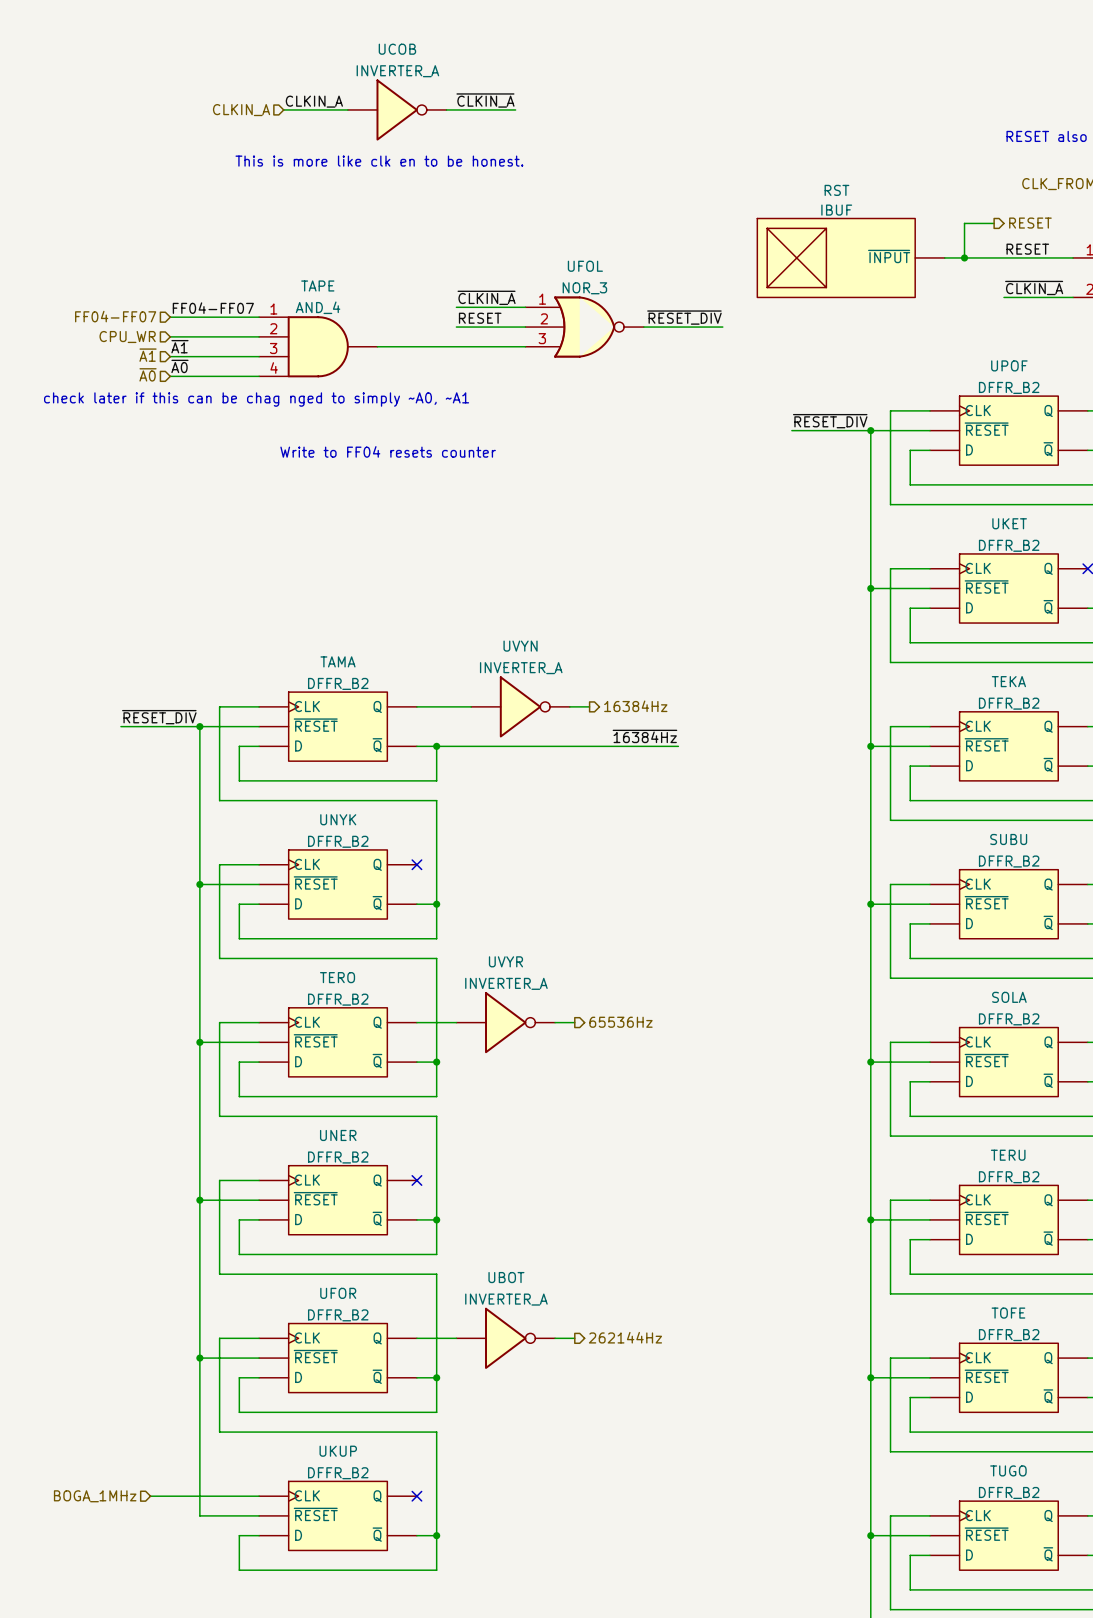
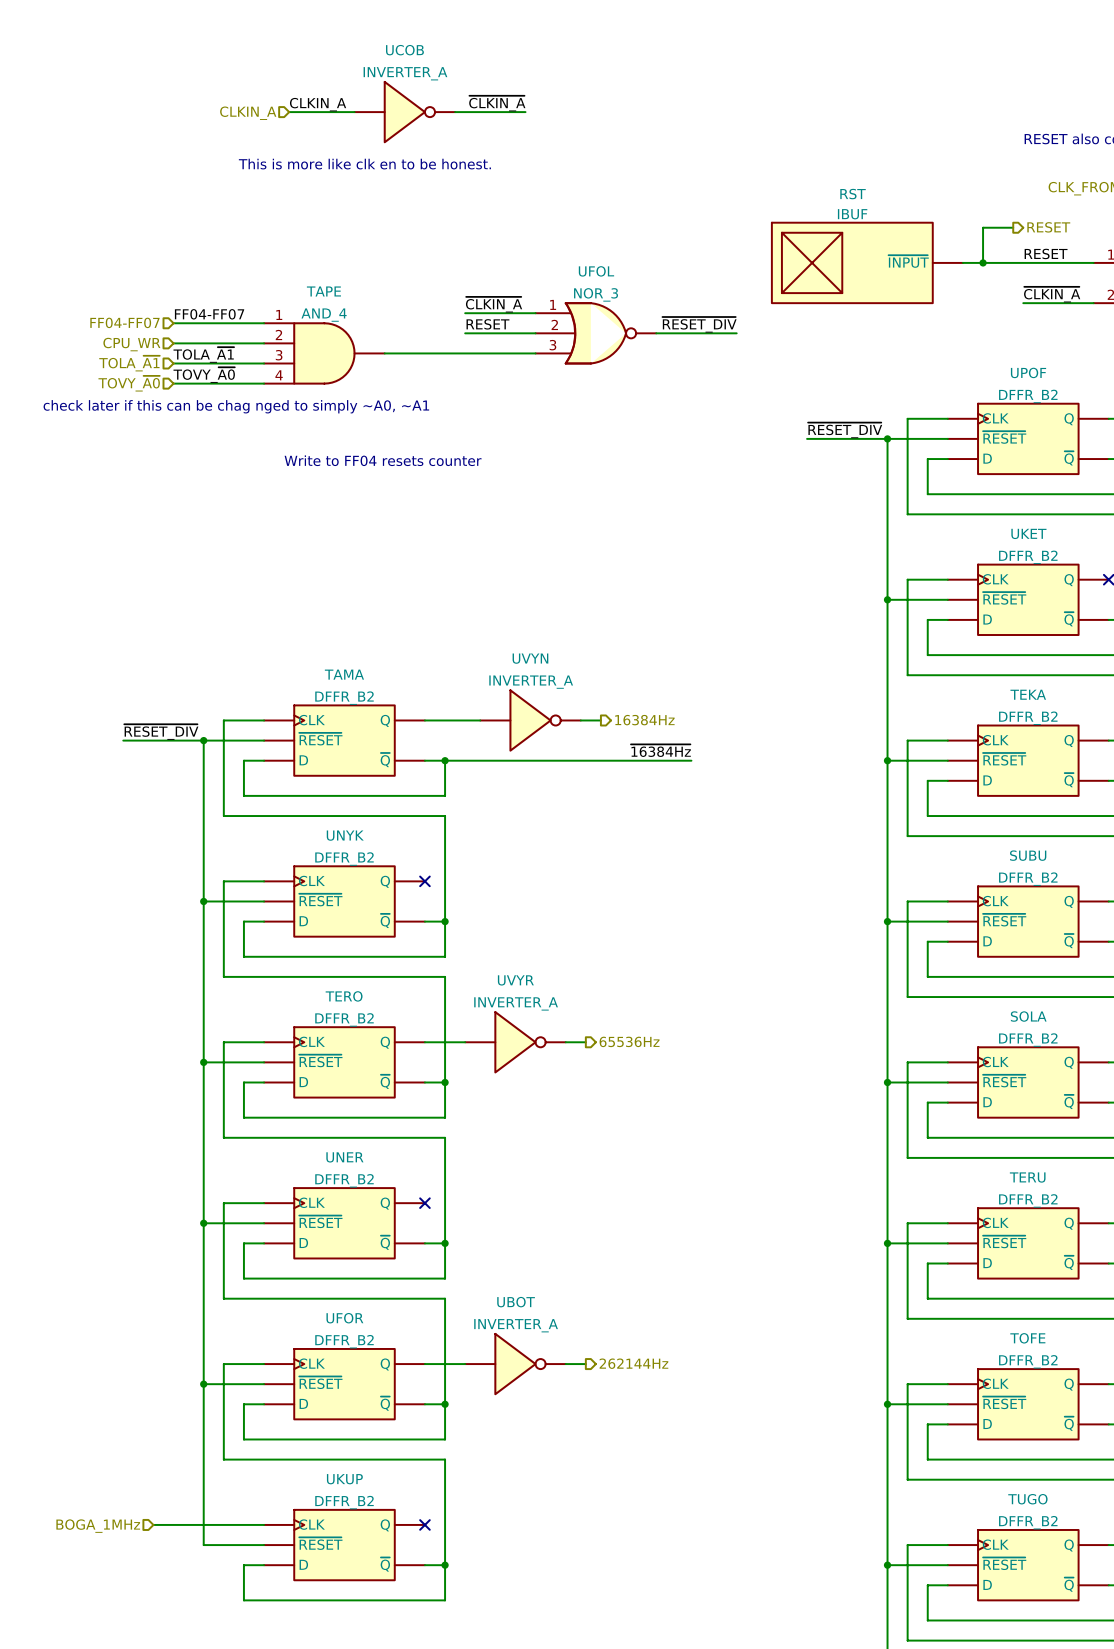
label: ~{A1} (179, 346) -> TOLA_~{A1} (203, 354)
hierarchical label: ~{A1} (148, 355) -> TOLA_~{A1} (129, 363)
label: ~{A0} (179, 366) -> TOVY_~{A0} (204, 375)
hierarchical label: ~{A0} (148, 374) -> TOVY_~{A0} (129, 383)

